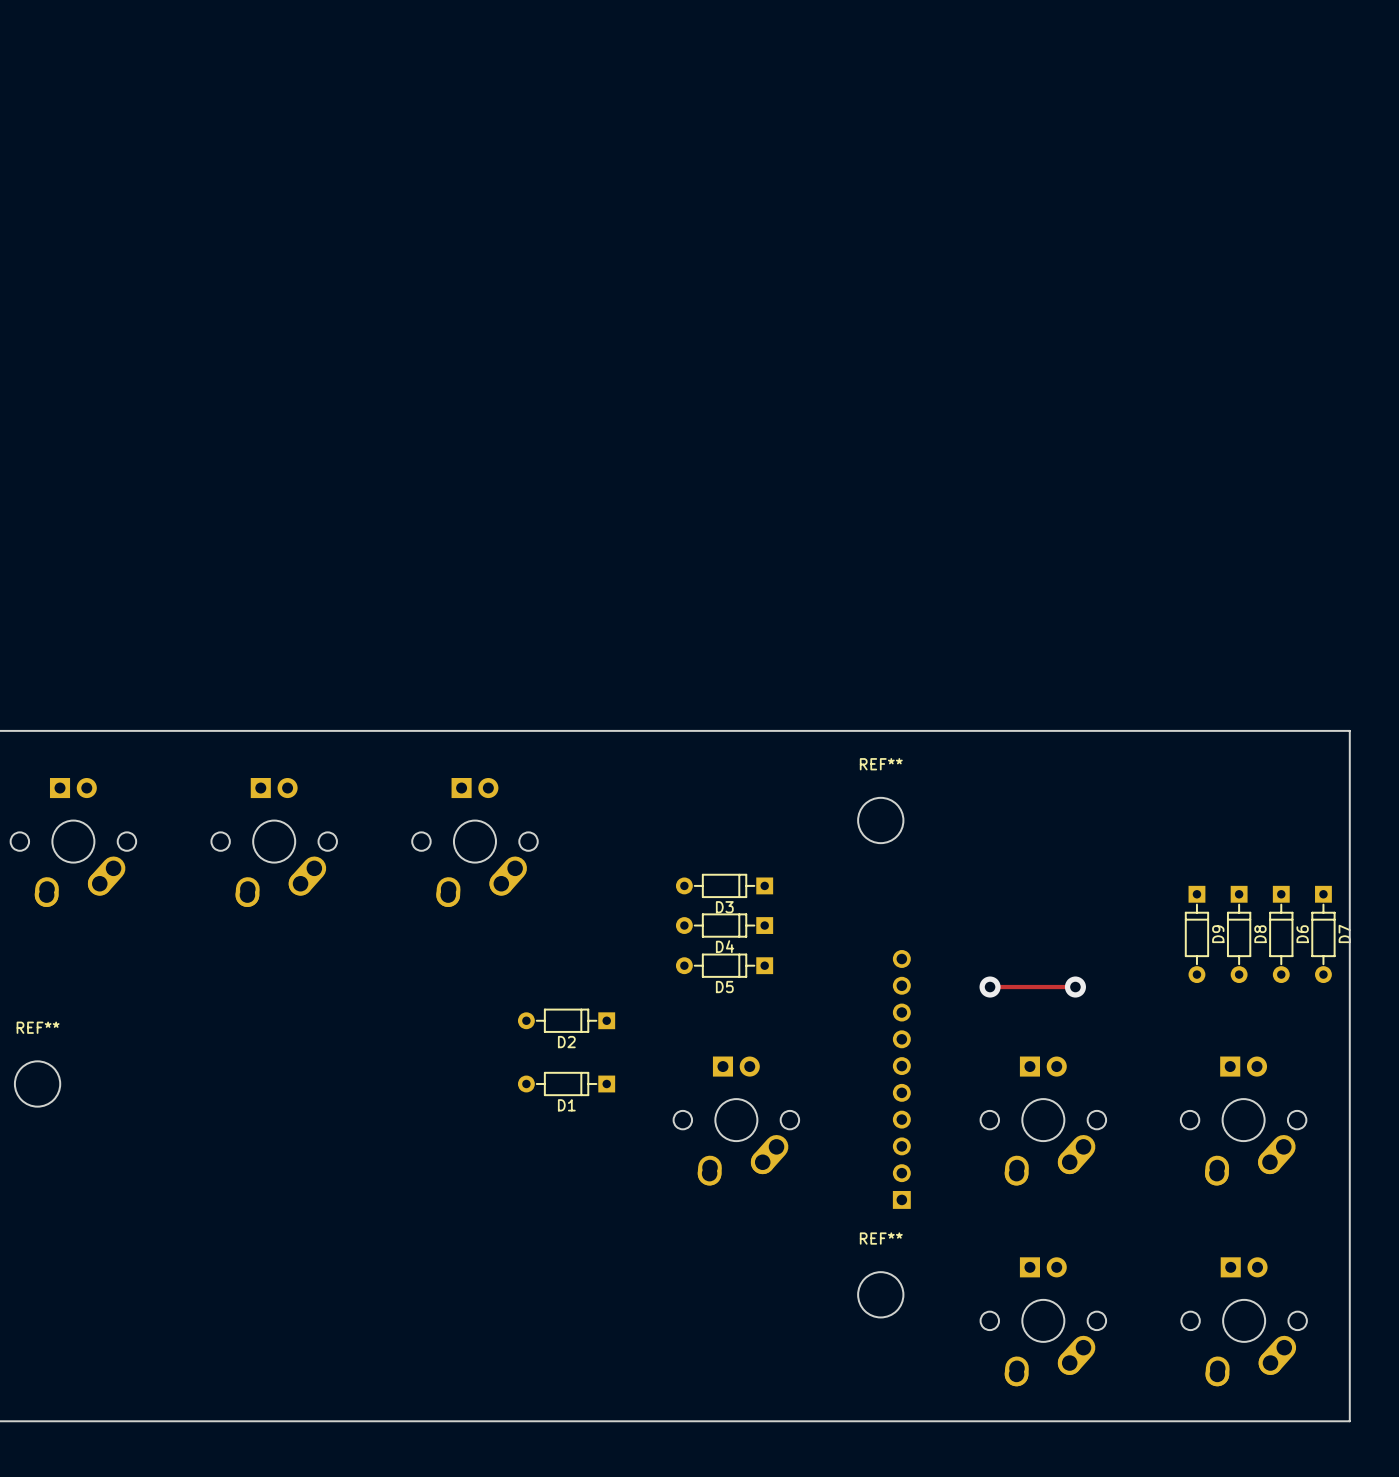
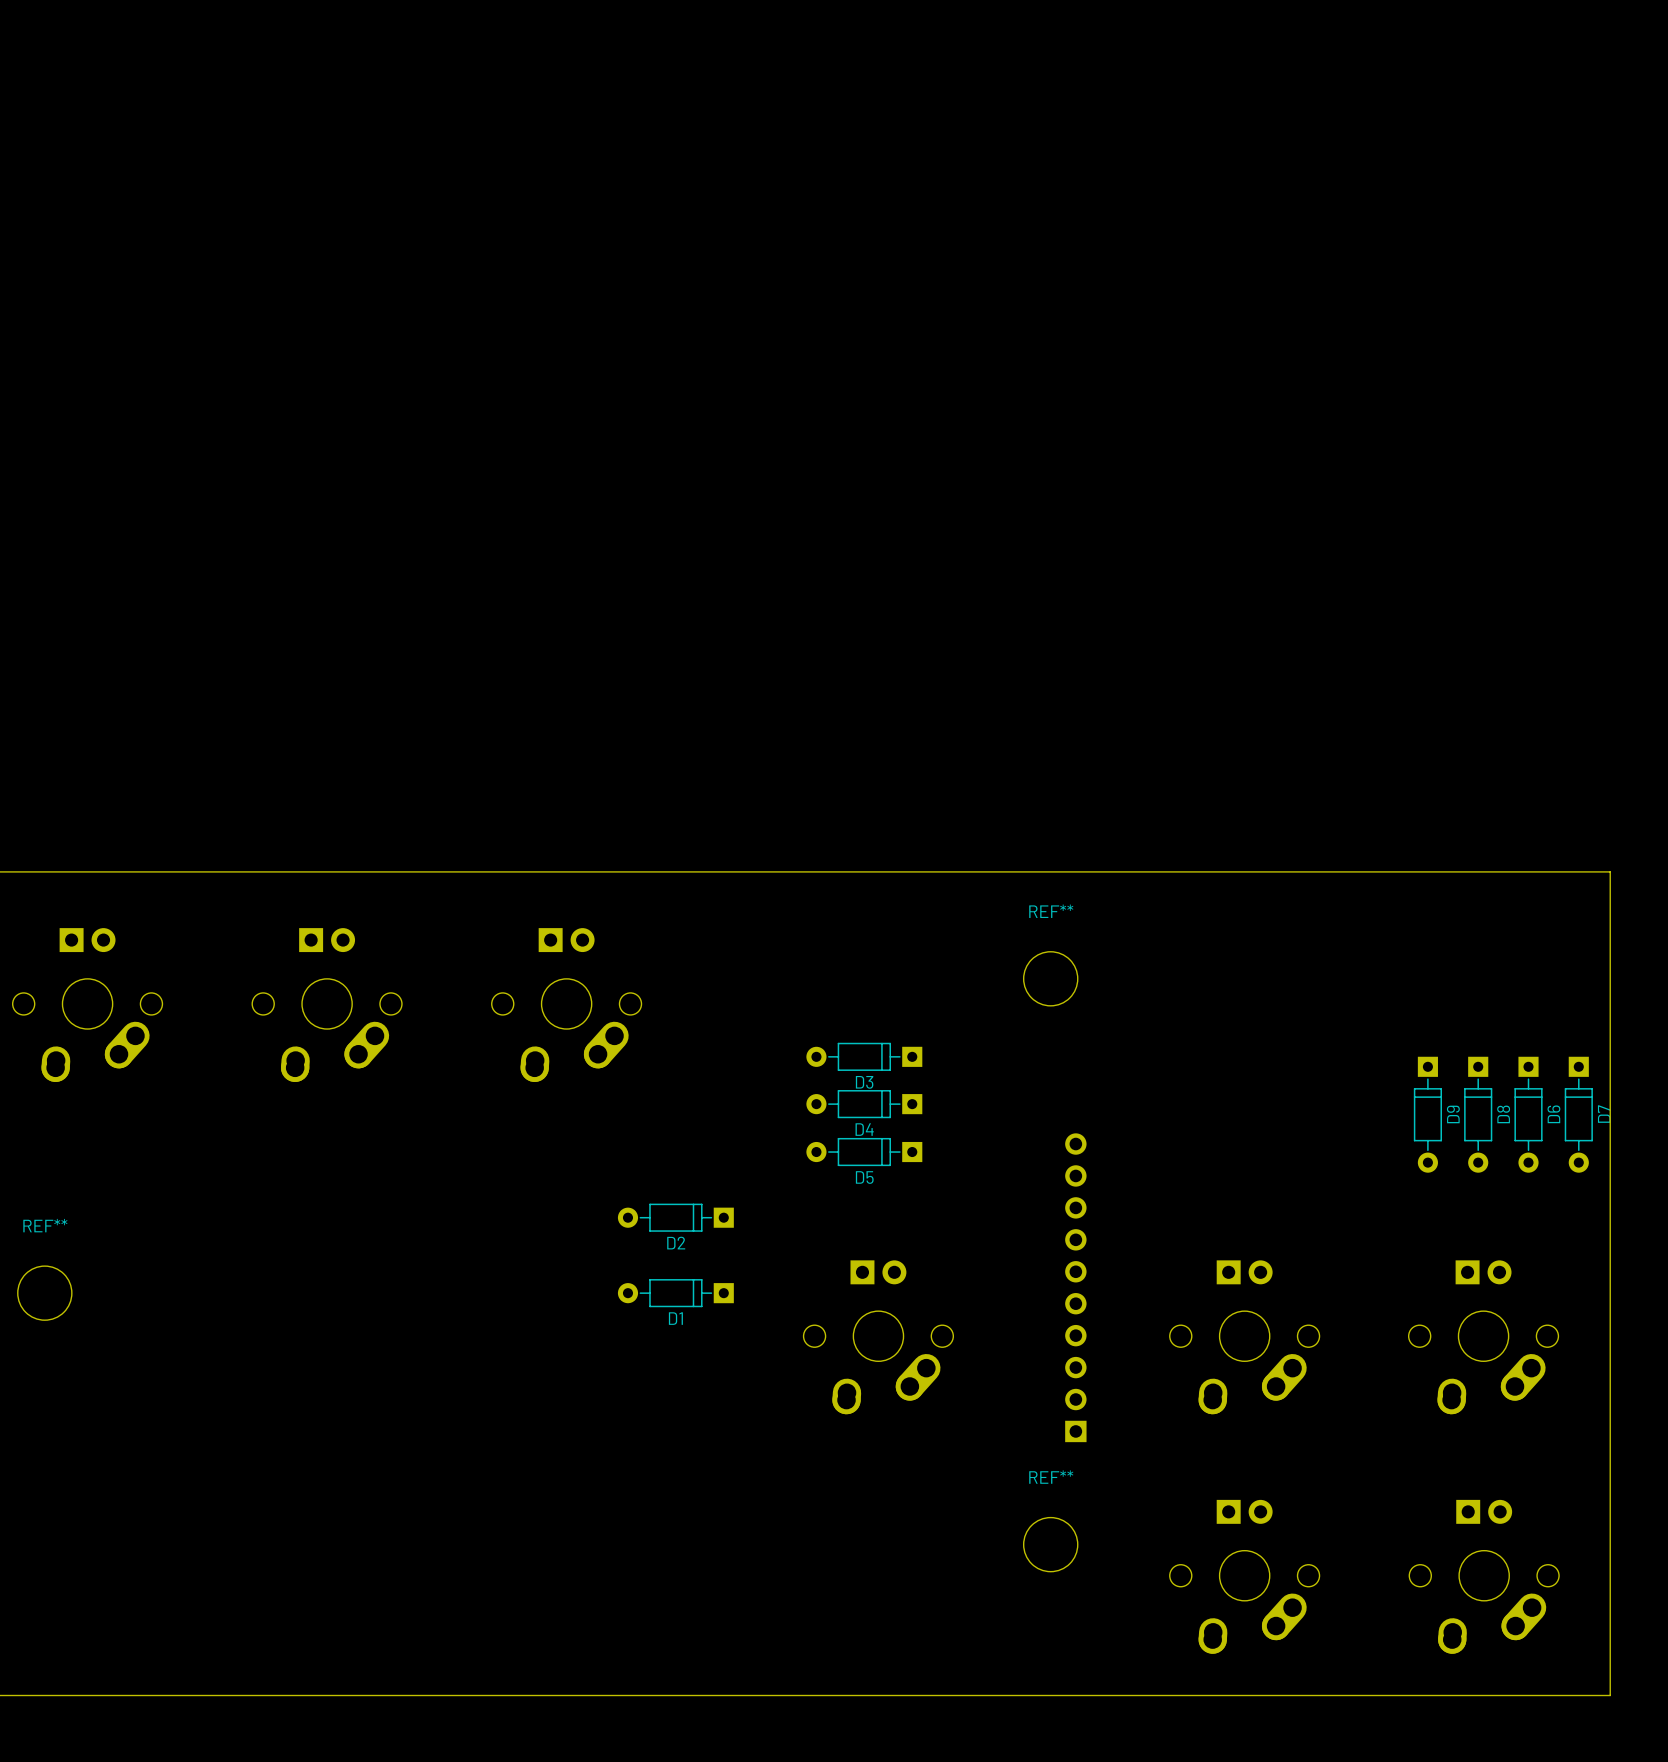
track: (990, 987) (1075, 987) -> none
via: (990, 987) -> none
via: (1075, 987) -> none

